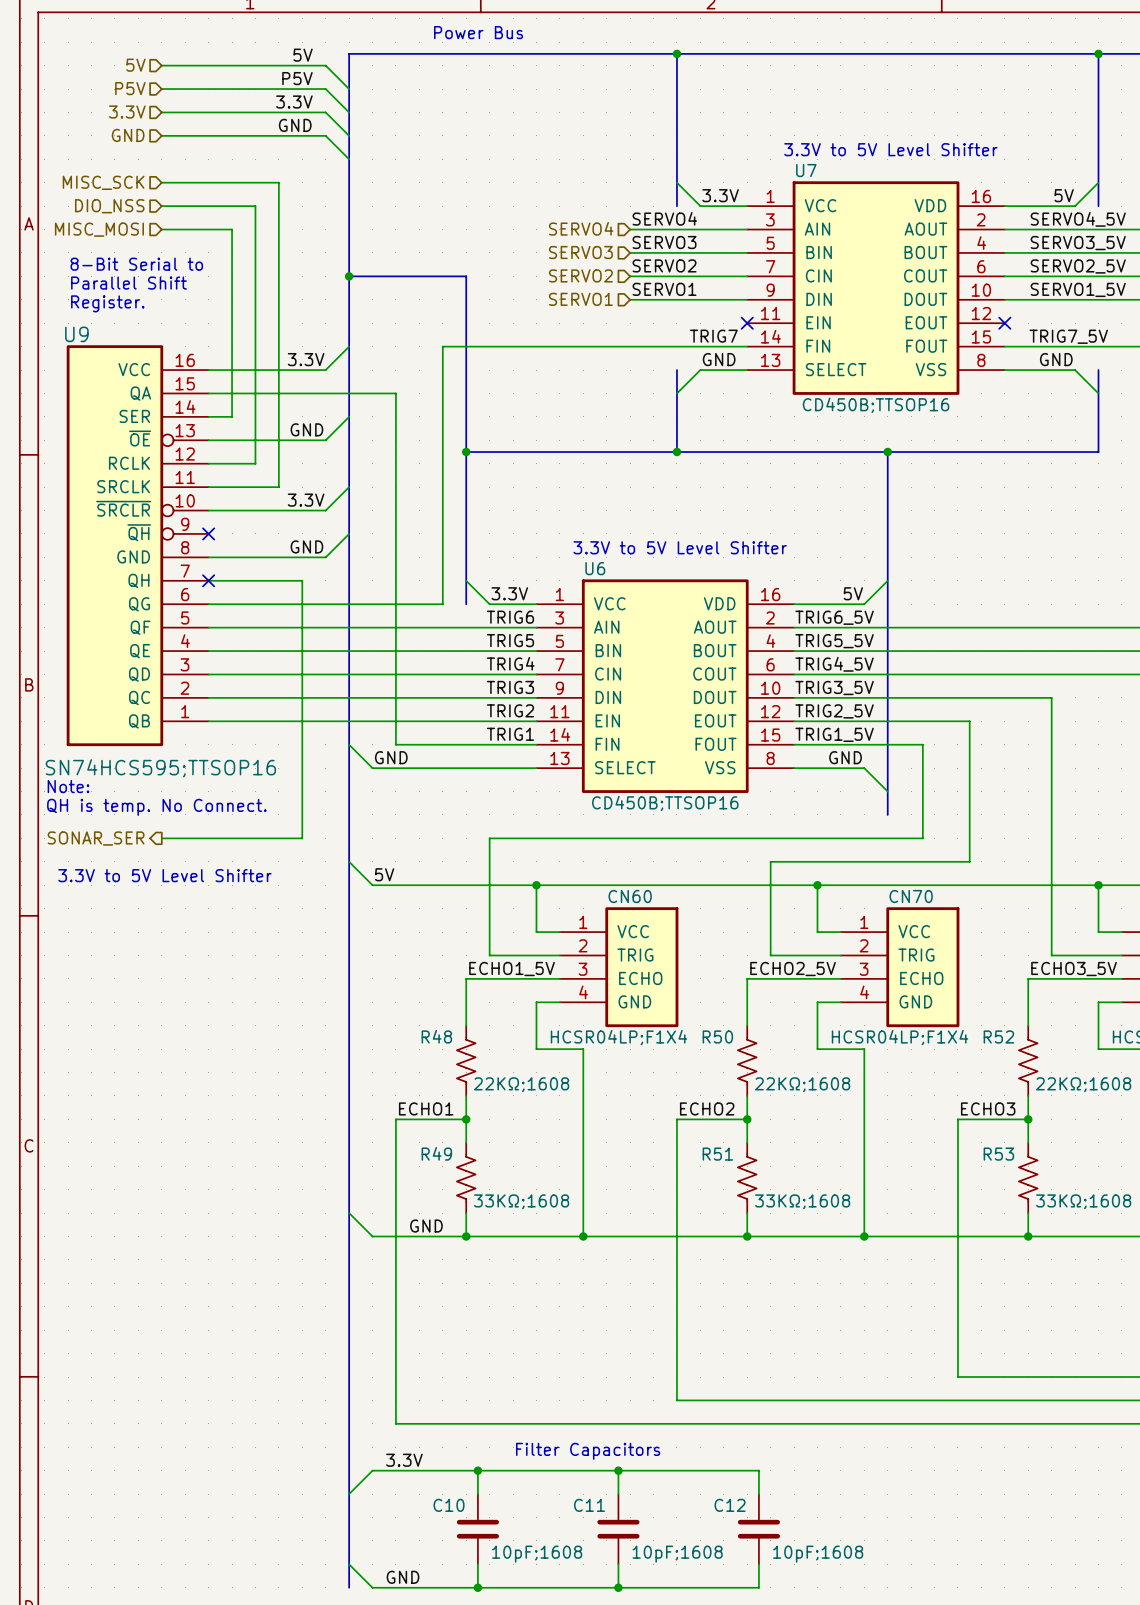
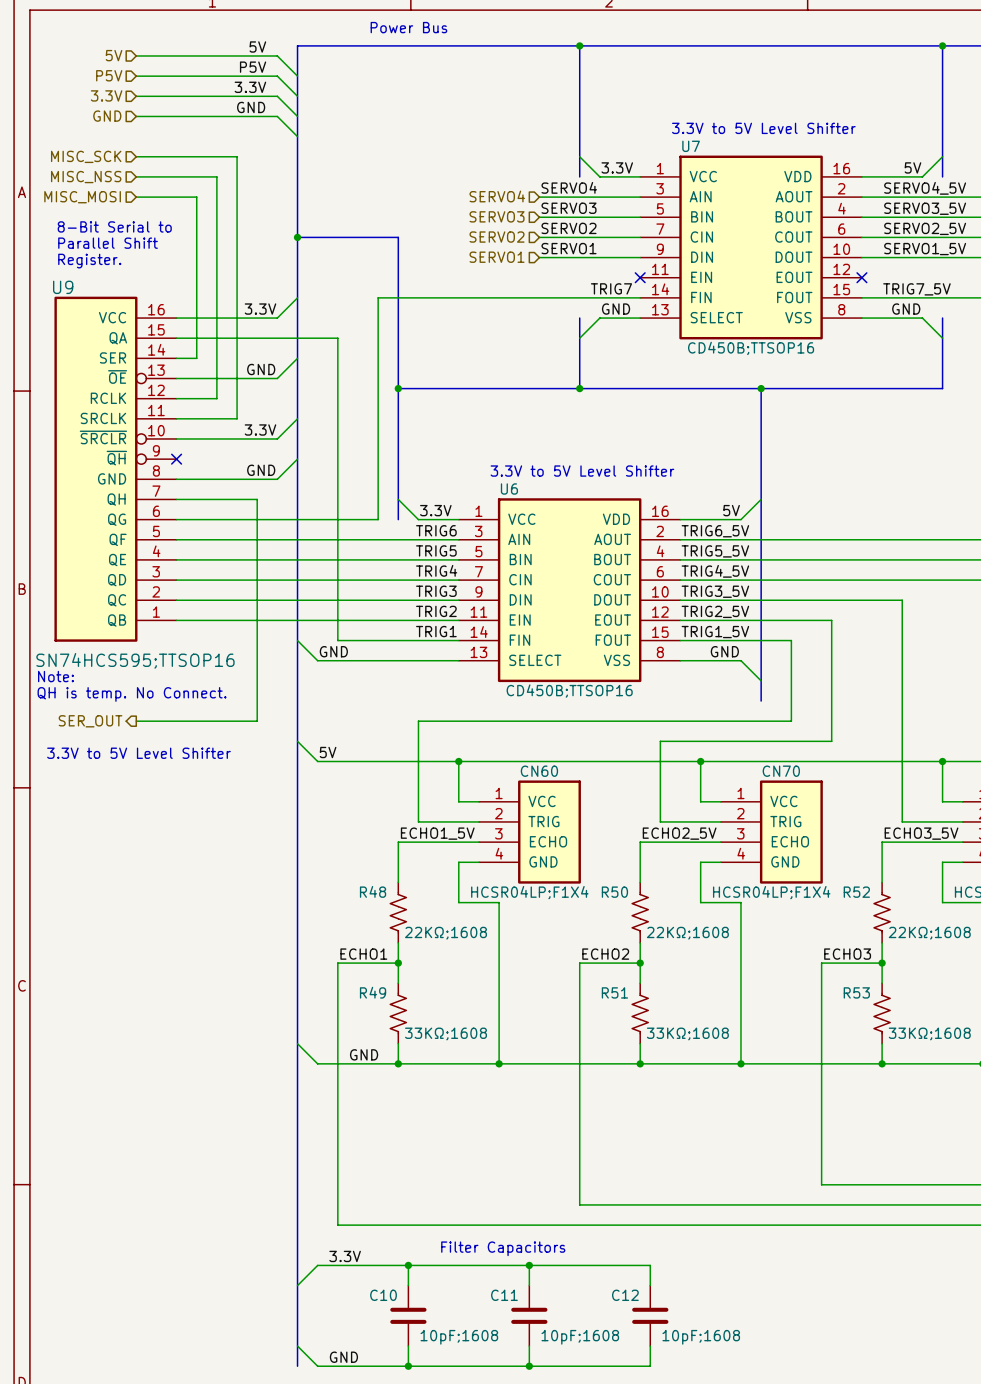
hierarchical label: DIO_NSS (109, 206) -> MISC_NSS (86, 177)
no-connect mark: (208, 580) -> none
hierarchical label: SONAR_SER (96, 838) -> SER_OUT (90, 721)

